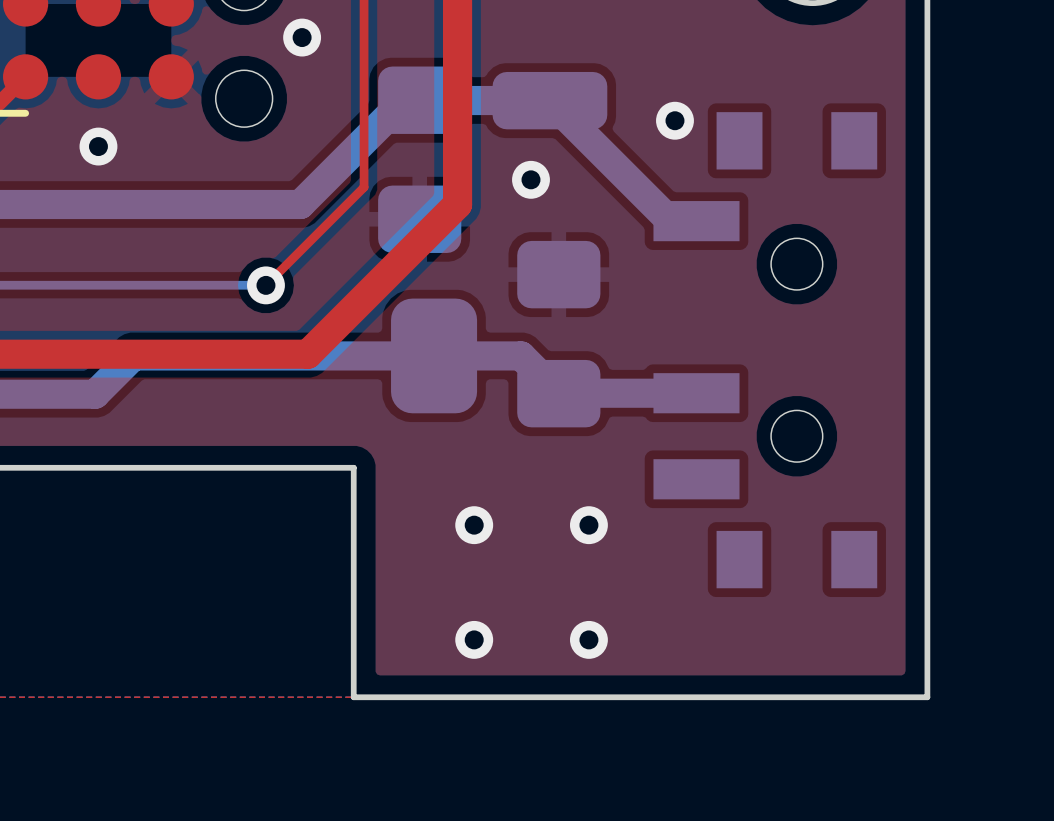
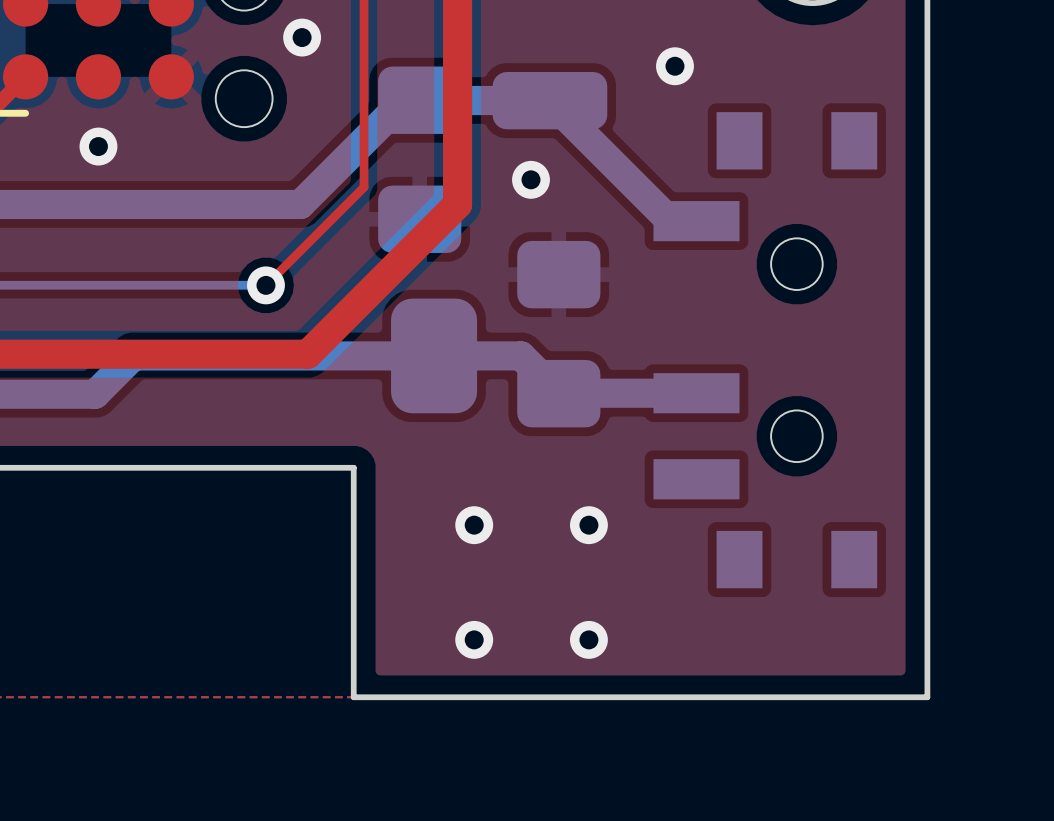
via: none -> (674, 66)
via: (674, 120) -> none

